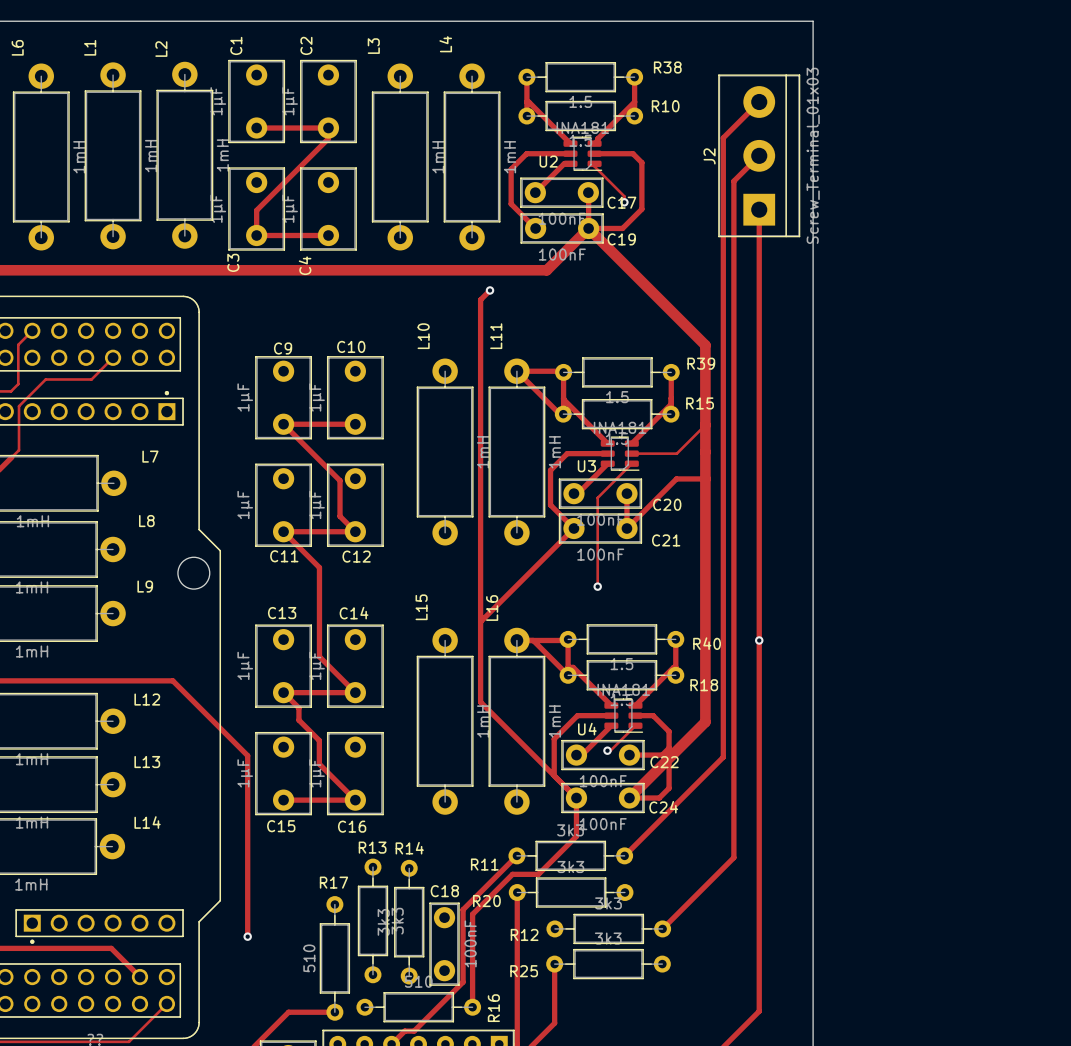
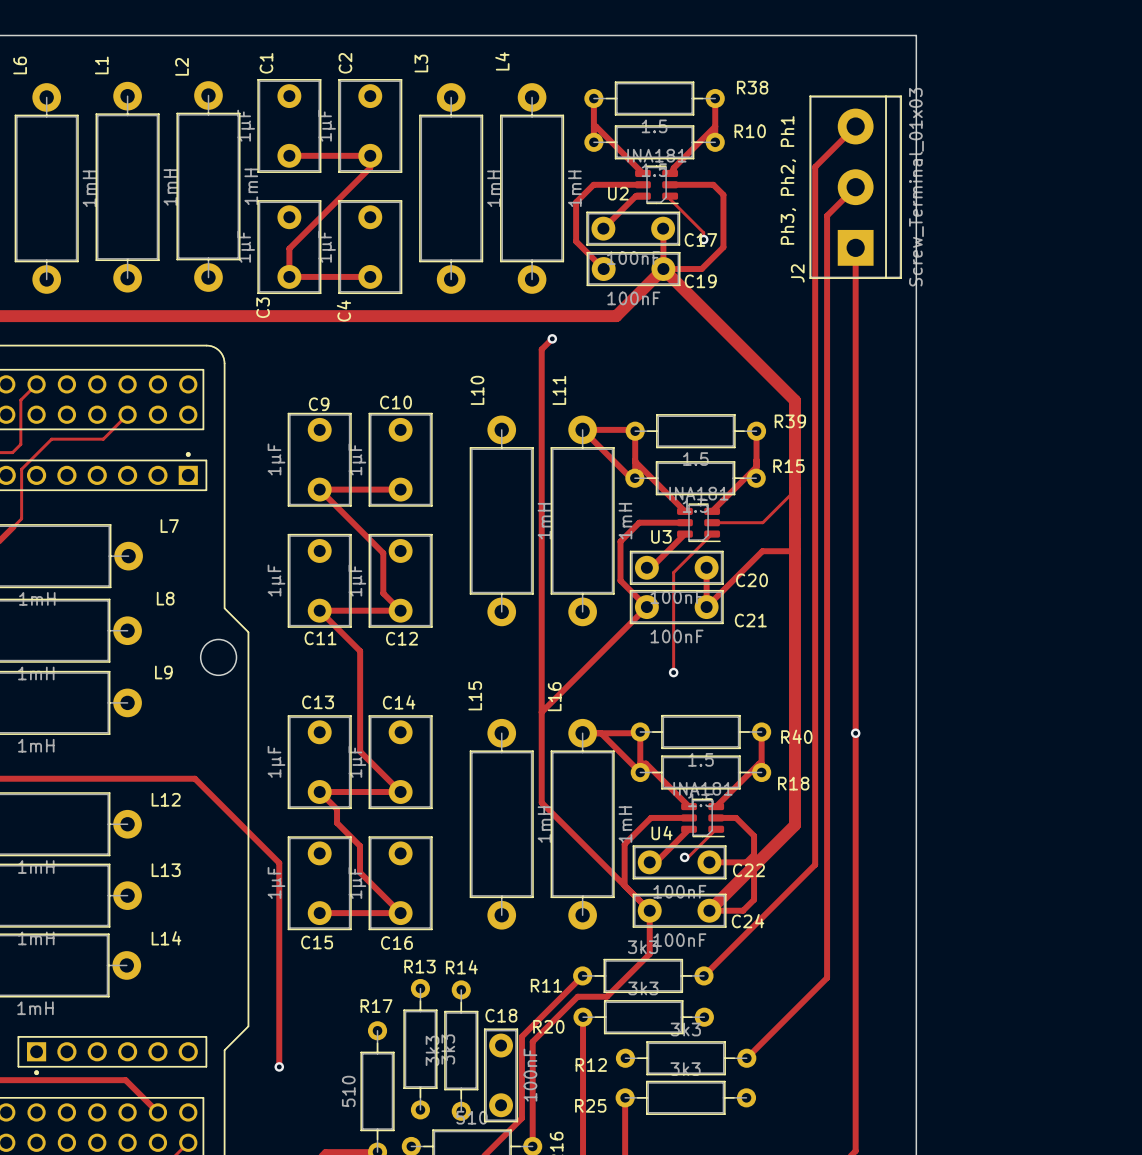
text: none -> Ph3, Ph2, Ph1 (788, 180)
J2 name position: J2 (709, 156) -> J2 (797, 273)

